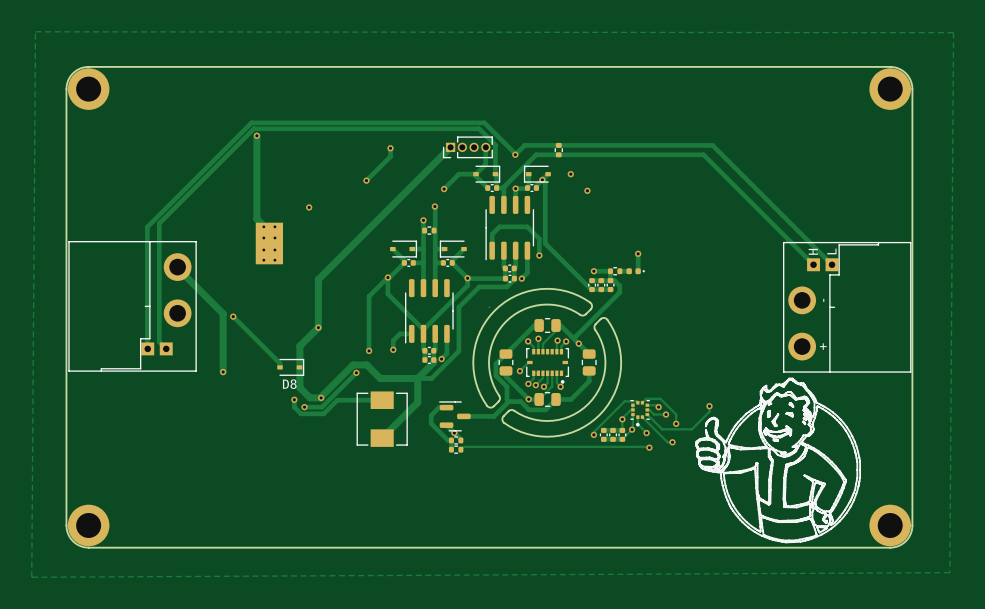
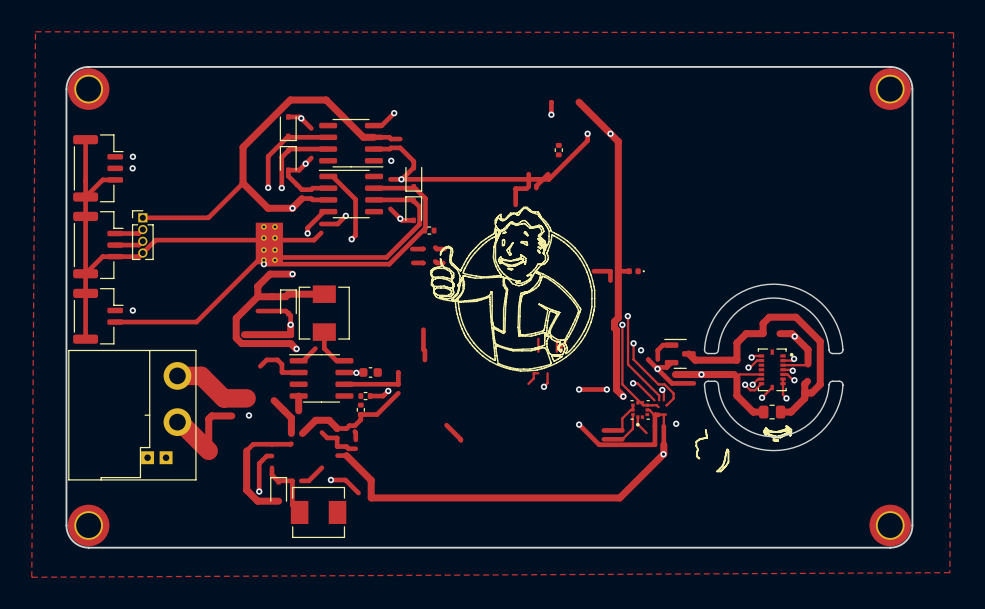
track: none -> (551, 102) (551, 114)
track: none -> (579, 102) (618, 141) (618, 317) (614, 321) (614, 328) (616, 330) (616, 389) (623, 396)
track: none -> (394, 113) (381, 125) (373, 125)
via: none -> (394, 113)
via: none -> (551, 114)
track: none -> (288, 116) (299, 116) (311, 128)
via: none -> (301, 118)
part: none -> (288, 127)
track: none -> (587, 133) (587, 140) (548, 179) (390, 179)
via: none -> (587, 133)
via: none -> (610, 133)
track: (256, 135) (256, 219) (263, 225) -> none
via: (256, 135) -> none
track: none -> (328, 137) (288, 136) (268, 156) (268, 187)
track: none -> (85, 139) (85, 339)
track: none -> (400, 139) (363, 137) (326, 100) (290, 100) (243, 147) (243, 183)
part: none -> (351, 143)
track: (450, 147) (318, 279) (318, 327) (299, 346) (299, 387) (310, 397) (321, 397) (353, 364) (366, 364) (380, 378) (417, 378) -> none
part: (467, 147) -> none
track: (485, 147) (485, 164) (476, 176) -> none
track: (390, 148) (390, 156) (366, 180) -> none
via position: (390, 148) -> (391, 160)
track: none -> (328, 149) (289, 149) (281, 157) (281, 188)
track: none -> (373, 149) (400, 147) (413, 161) (413, 167) (401, 179)
via: (515, 154) -> none
via: none -> (132, 156)
track: none -> (311, 157) (299, 170) (288, 170) (288, 176) (301, 189) (328, 188)
part: none -> (288, 159)
via: none -> (305, 163)
part: none -> (98, 168)
via: none -> (132, 168)
part: (486, 174) -> none
part: (537, 174) -> none
via: (570, 174) -> none
track: none -> (328, 176) (332, 176) (355, 199) (355, 235) (351, 239)
part: none -> (413, 178)
track: none -> (115, 179) (102, 179) (85, 197)
via: none -> (401, 179)
track: (542, 179) (545, 182) (545, 243) (591, 289) (610, 289) -> none
via: (542, 179) -> none
via: (366, 180) -> none
track: none -> (243, 183) (208, 217) (142, 217)
track: none -> (243, 183) (268, 208) (292, 208) (301, 198) (328, 199)
via: none -> (268, 187)
via: none -> (281, 188)
track: none -> (374, 188) (413, 186) (425, 198) (425, 228) (389, 264) (263, 264)
track: (487, 188) (473, 174) (459, 174) (444, 189) -> none
part: (492, 188) -> none
track: (502, 188) (496, 188) (495, 145) (479, 128) (253, 128) (159, 223) (159, 341) (166, 348) -> none
via: (515, 188) -> none
part: (531, 188) -> none
via: (444, 189) -> none
via: (587, 190) -> none
part: none -> (350, 194)
track: none -> (374, 199) (412, 199) (419, 206) (419, 224) (386, 257) (261, 257) (196, 322) (115, 322)
track: (503, 204) (503, 187) (536, 154) (703, 154) (813, 264) -> none
track: (434, 206) (435, 288) -> none
via: (434, 206) -> none
via: (309, 207) -> none
via: none -> (292, 208)
track: none -> (390, 208) (401, 220) (413, 220)
part: none -> (413, 209)
track: none -> (328, 211) (323, 211) (307, 227) (307, 233)
track: none -> (345, 215) (337, 223) (321, 223)
via: none -> (345, 215)
via: none -> (400, 218)
track: (423, 220) (423, 288) -> none
via: (423, 220) -> none
part: (509, 228) -> none
track: none -> (142, 229) (138, 233) (115, 233)
line: none -> (496, 229) (495, 233) (496, 236) (499, 231) (496, 229)
line: none -> (524, 231) (527, 235) (524, 233)
track: none -> (321, 232) (314, 240) (155, 240) (139, 256) (102, 256) (85, 273)
line: none -> (504, 232) (503, 232) (503, 233) (505, 232) (504, 232)
via: none -> (307, 233)
part: none -> (142, 235)
line: none -> (539, 236) (546, 245) (549, 241) (547, 227) (537, 214) (530, 211) (526, 208) (523, 208) (518, 215) (512, 214) (503, 220) (501, 220) (497, 217) (495, 224) (495, 220) (497, 216) (500, 214) (501, 219) (504, 219) (510, 213) (517, 213) (523, 207) (527, 207) (532, 211) (538, 211) (551, 231) (575, 248) (589, 270) (594, 290) (594, 306) (591, 322) (577, 345) (556, 363) (535, 370) (520, 371) (504, 367) (489, 360) (477, 350) (465, 336) (458, 318) (455, 301) (436, 296) (433, 292) (434, 287)
line: none -> (539, 236) (543, 231) (541, 226) (538, 225) (531, 227) (525, 220) (516, 223) (511, 221) (500, 230) (495, 226) (494, 233) (480, 242) (471, 252) (460, 271)
line: none -> (494, 237) (493, 258) (501, 275) (483, 277) (463, 273) (474, 253) (486, 242) (494, 237)
via: none -> (351, 239)
line: none -> (503, 239) (504, 244) (502, 245) (502, 240) (503, 239)
track: none -> (142, 241) (139, 245) (115, 245)
line: none -> (521, 241) (526, 241) (527, 245) (520, 242) (521, 241)
line: none -> (512, 242) (507, 250) (509, 254) (511, 254) (509, 248) (512, 242)
part: none -> (98, 245)
line: none -> (538, 246) (539, 247) (540, 248) (538, 247) (538, 246)
track: (392, 249) (404, 262) (387, 277) -> none
part: (403, 249) -> none
part: (453, 249) -> none
track: (464, 249) (452, 262) (467, 278) (505, 278) (503, 250) -> none
track: (492, 250) (492, 234) (499, 226) (527, 226) (539, 238) (539, 255) -> none
track: (515, 250) (514, 279) (506, 286) (479, 286) (458, 307) (458, 351) (431, 378) (417, 378) -> none
track: (527, 250) (527, 273) (521, 278) -> none
line: none -> (539, 252) (537, 250) (539, 252)
line: none -> (543, 252) (543, 249) (538, 242) (545, 249) (538, 238) (545, 247) (538, 236) (541, 230) (539, 226) (529, 228) (524, 223) (515, 225) (510, 223) (501, 231) (495, 244) (495, 259) (498, 267) (507, 277) (520, 281) (515, 282) (517, 283) (528, 279) (531, 274) (527, 275) (537, 264) (542, 263) (545, 260) (543, 253)
track: (638, 253) (638, 271) -> none
via: (638, 253) -> none
line: none -> (520, 254) (525, 258) (524, 264) (524, 261) (514, 266) (507, 266) (500, 263) (498, 260) (500, 257) (511, 260) (520, 257) (520, 254)
via: (539, 255) -> none
line: none -> (440, 258) (443, 266) (453, 273) (451, 280) (454, 285) (453, 293) (450, 296) (439, 296)
line: none -> (440, 258) (441, 266) (430, 270) (431, 285) (433, 287)
line: none -> (522, 259) (513, 260) (500, 260) (511, 265) (520, 262) (523, 259) (522, 259)
part: (408, 262) -> none
part: (447, 262) -> none
via: none -> (263, 264)
track: (832, 264) (712, 145) (524, 145) (515, 154) (484, 122) (251, 122) (147, 227) (147, 349) -> none
track: (177, 268) (223, 313) (223, 372) -> none
line: none -> (508, 268) (510, 268) (512, 269) (509, 269) (508, 268)
part: (509, 268) -> none
line: none -> (460, 271) (451, 262) (451, 248) (448, 246) (444, 247) (441, 251) (440, 255) (445, 248) (451, 248) (450, 261) (457, 269) (460, 275) (459, 282) (457, 292) (452, 297) (446, 299) (439, 296)
via: (593, 271) -> none
part: (615, 271) -> none
track: none -> (292, 274) (270, 274) (257, 286) (257, 296)
via: none -> (292, 274)
track: (387, 277) (369, 296) (369, 350) -> none
track: (387, 277) (387, 294) (423, 329) (467, 285) (467, 278) -> none
via: (387, 277) -> none
line: none -> (433, 277) (432, 271) (437, 268) (444, 268) (450, 271) (452, 275) (451, 278) (433, 277)
line: none -> (438, 278) (451, 282) (452, 287) (433, 286) (431, 282) (433, 279) (438, 278)
line: none -> (461, 278) (463, 290) (455, 300) (451, 300) (457, 293) (461, 278)
via: (467, 278) -> none
part: (509, 278) -> none
via: (521, 278) -> none
track: (592, 280) (614, 280) (619, 286) (619, 292) (575, 337) (572, 337) -> none
part: (592, 285) -> none
part: (601, 285) -> none
part: (610, 285) -> none
line: none -> (436, 288) (445, 288) (451, 291) (447, 295) (437, 295) (434, 291) (436, 288)
track: none -> (324, 294) (257, 296)
track: none -> (257, 296) (236, 318) (236, 338) (241, 343) (290, 343) (296, 348)
line: none -> (489, 296) (476, 301) (458, 303) (461, 319) (470, 338) (481, 350) (495, 360) (489, 296)
line: none -> (456, 300) (481, 298) (492, 292) (493, 325) (503, 331) (503, 309) (506, 290) (503, 285) (503, 276) (475, 278) (463, 275) (463, 290) (456, 300)
part: none -> (288, 302)
board edge: (590, 302) (566, 291) (541, 289) (516, 295) (494, 310) (480, 331) (473, 356) (475, 382) (487, 406) (493, 406) (499, 399) (490, 374) (489, 357) (493, 340) (506, 321) (525, 308) (541, 304) (559, 305) (583, 315) (591, 308) (590, 302) -> none
part position: (132, 306) -> (132, 415)
part: (847, 307) -> none
via: none -> (132, 310)
track: none -> (257, 311) (285, 311) (290, 315) (290, 334) (244, 334)
part: (429, 311) -> none
line: none -> (550, 311) (556, 314) (546, 336) (547, 320) (550, 311)
line: none -> (559, 312) (539, 304) (547, 310) (544, 330) (520, 334) (522, 295) (537, 286) (542, 276) (559, 287) (577, 308) (576, 316) (564, 340) (557, 339) (550, 333) (559, 312)
part: none -> (324, 313)
part: none -> (98, 316)
track: (233, 316) (280, 363) (280, 367) -> none
via: (233, 316) -> none
track: none -> (627, 316) (628, 364) (659, 395) (659, 400)
via: none -> (627, 316)
board edge: (600, 319) (594, 327) (604, 350) (604, 373) (598, 390) (588, 403) (574, 414) (552, 420) (535, 419) (510, 410) (503, 416) (503, 422) (527, 434) (553, 436) (578, 429) (599, 415) (607, 405) (616, 387) (621, 362) (618, 343) (614, 331) (606, 319) (600, 319) -> none
via: none -> (290, 324)
track: none -> (622, 324) (622, 384) (643, 405) (647, 405)
via: none -> (622, 324)
track: (539, 325) (534, 325) (495, 364) (495, 375) (507, 386) (507, 399) (508, 401) -> none
part: (547, 325) -> none
via: (318, 327) -> none
line: none -> (493, 328) (503, 333) (504, 332) (507, 289) (504, 283) (504, 277) (518, 285) (530, 280) (534, 272) (540, 274) (538, 281) (530, 289) (520, 294) (518, 335)
line: none -> (493, 328) (495, 343) (502, 346) (513, 349) (532, 348) (544, 344) (545, 332) (531, 336) (518, 335)
track: none -> (324, 332) (324, 348) (336, 360) (344, 360)
track: (411, 333) (399, 333) (393, 340) (393, 349) -> none
track: (435, 333) (433, 362) (417, 378) -> none
track: (446, 333) (446, 353) (441, 359) -> none
track: none -> (779, 333) (791, 333) (808, 349) (806, 365) (783, 365)
line: none -> (549, 336) (552, 339) (560, 342) (557, 348) (560, 351) (561, 349) (558, 349) (558, 347) (563, 344) (564, 348) (562, 354) (549, 353) (546, 340) (549, 336)
via: none -> (794, 336)
via: (538, 338) -> none
via: (557, 340) -> none
track: (528, 341) (533, 346) (533, 351) -> none
via: (528, 341) -> none
via: (566, 341) -> none
line: none -> (564, 342) (567, 349) (565, 353) (574, 345) (584, 330) (591, 306) (591, 290) (587, 272) (578, 256) (567, 244) (551, 235) (547, 253) (547, 259) (536, 271) (562, 287) (580, 309) (574, 325) (564, 342)
via: (578, 343) -> none
track: none -> (633, 343) (633, 359) (658, 384) (664, 384) (673, 393) (673, 398) (666, 405)
via: none -> (633, 343)
line: none -> (496, 345) (513, 350) (531, 350) (544, 347) (551, 363) (529, 369) (517, 369) (502, 365) (498, 363) (496, 345)
track: none -> (671, 345) (662, 345) (657, 350) (657, 359)
via: none -> (296, 348)
track: none -> (315, 348) (303, 360) (298, 360)
via: (393, 349) -> none
board edge: none -> (704, 349) (710, 324) (726, 303) (748, 289) (773, 284) (799, 289) (821, 303) (836, 324) (842, 349) (840, 353) (829, 352) (823, 328) (813, 315) (805, 307) (790, 300) (773, 298) (757, 300) (742, 307) (733, 315) (724, 328) (717, 352) (707, 353) (704, 349)
via: (369, 350) -> none
part: (429, 350) -> none
via: none -> (641, 350)
track: (542, 351) (542, 343) (556, 330) (556, 325) (560, 325) (589, 354) -> none
part: none -> (679, 353)
track: none -> (688, 353) (695, 360) (736, 360) (736, 342) (746, 333) (763, 333) (763, 323) (769, 317) (796, 317) (820, 341) (820, 384) (811, 393) (804, 393)
track: none -> (761, 355) (751, 357)
line: none -> (561, 356) (554, 361) (551, 355) (561, 356)
via: none -> (751, 357)
track: none -> (794, 358) (783, 360)
via: none -> (794, 358)
via: (441, 359) -> none
track: none -> (648, 359) (671, 383) (693, 383)
part: (429, 360) -> none
track: none -> (761, 360) (757, 360) (748, 367)
part: (505, 362) -> none
track: (529, 362) (519, 371) -> none
part: (589, 362) -> none
track: none -> (671, 362) (666, 367) (656, 367)
part rotation: 0° (547, 365) -> 90° counterclockwise (775, 369)
part position: (547, 365) -> (775, 369)
track: none -> (260, 366) (266, 359) (277, 359) (281, 364) (282, 372) (298, 372)
D8: (290, 367) -> none
via: none -> (748, 367)
via: none -> (657, 368)
track: none -> (783, 369) (792, 370)
track: (505, 370) (505, 376) (528, 399) (539, 399) (552, 386) (552, 373) -> none
track: (589, 370) (589, 381) (571, 399) (556, 399) (545, 409) (529, 409) (520, 401) (508, 401) -> none
via: none -> (792, 370)
via: (519, 371) -> none
via: (223, 372) -> none
track: (356, 372) (322, 407) (304, 407) -> none
part: none -> (370, 372)
track: none -> (398, 372) (398, 384) (344, 384)
track: (542, 373) (542, 378) (535, 385) -> none
track: (556, 373) (556, 383) (560, 386) -> none
track: none -> (675, 374) (734, 374) (736, 377)
via: none -> (701, 374)
track: none -> (761, 374) (739, 374) (736, 377)
track: none -> (783, 374) (787, 374) (794, 380)
track: none -> (177, 375) (201, 375) (223, 398) (246, 398)
track: none -> (736, 377) (736, 395) (753, 412) (763, 412)
part: none -> (321, 378)
track: (417, 378) (417, 402) (382, 438) -> none
track: none -> (761, 379) (758, 379) (752, 384)
track: none -> (783, 379) (783, 394) (786, 398)
via: none -> (794, 380)
board edge: none -> (708, 381) (717, 382) (724, 406) (737, 423) (757, 434) (773, 436) (790, 434) (805, 426) (817, 415) (823, 406) (829, 382) (840, 381) (842, 385) (836, 410) (821, 431) (799, 445) (773, 450) (754, 447) (742, 442) (721, 426) (713, 416) (706, 398) (704, 384) (708, 381)
track: none -> (807, 381) (804, 384) (804, 398) (791, 412) (780, 412)
via: (528, 383) -> none
track: none -> (633, 383) (637, 383) (654, 400)
via: none -> (633, 383)
track: none -> (761, 383) (754, 390) (750, 390) (745, 384)
via: none -> (745, 384)
via: none -> (752, 384)
via: (535, 385) -> none
via position: (560, 386) -> (579, 389)
track: none -> (772, 387) (762, 397)
track: none -> (579, 389) (606, 389)
via: none -> (606, 389)
track: none -> (662, 389) (663, 400)
via: none -> (662, 389)
track: none -> (388, 390) (383, 396) (370, 396)
via: none -> (388, 390)
track: none -> (398, 393) (377, 414) (360, 414) (360, 419) (354, 425) (349, 425) (346, 428) (337, 428)
line: (775, 394) (781, 396) (790, 394) (795, 399) (804, 398) (806, 404) (803, 407) (811, 418) (803, 410) (810, 420) (803, 414) (809, 420) (810, 431) (807, 434) (803, 435) (792, 446) (797, 446) (794, 450) (786, 454) (781, 453) (785, 452) (776, 450) (769, 445) (760, 431) (762, 411) (766, 402) (775, 394) -> none
track: none -> (298, 396) (298, 410)
part: none -> (365, 396)
via: none -> (623, 396)
via: (321, 397) -> none
via: none -> (762, 397)
via: none -> (786, 398)
track: (294, 399) (294, 407) (301, 413) (323, 413) (337, 400) (382, 400) -> none
via: (294, 399) -> none
via: (528, 399) -> none
part: (547, 399) -> none
track: none -> (274, 400) (291, 417) (291, 433)
line: (761, 400) (764, 402) (762, 407) (761, 404) (761, 400) -> none
track: (508, 401) (494, 416) (463, 416) -> none
track: (637, 402) (624, 401) (593, 432) (593, 434) -> none
track: (642, 402) (646, 398) (660, 398) (676, 414) (676, 423) -> none
line: (770, 403) (769, 403) (768, 404) (771, 403) (770, 403) -> none
line: (790, 403) (793, 406) (789, 404) -> none
track: (709, 406) (709, 411) (691, 429) (662, 429) (647, 414) -> none
via: (709, 406) -> none
via: (304, 407) -> none
track: (446, 407) (439, 407) (431, 415) (431, 423) (448, 440) (451, 440) (451, 449) -> none
via: (658, 407) -> none
line: (759, 408) (740, 424) (728, 444) (749, 448) (766, 446) (758, 429) (761, 409) (759, 408) -> none
part: none -> (360, 409)
line: (769, 410) (769, 415) (767, 416) (767, 411) (769, 410) -> none
part: none -> (772, 412)
line: (786, 412) (786, 413) (792, 416) (792, 413) (786, 412) -> none
track: none -> (658, 414) (654, 415) (654, 444) (599, 444) (579, 424)
track: none -> (663, 414) (663, 453) (619, 497) (371, 497) (371, 480) (346, 455) (337, 455)
via: (666, 414) -> none
line: (778, 414) (775, 420) (776, 425) (774, 426) (772, 421) (778, 414) -> none
track: none -> (231, 415) (211, 415) (208, 418) (208, 450) (179, 422) (177, 422)
via: none -> (248, 415)
part: (454, 416) -> none
track: (642, 417) (667, 442) (672, 442) -> none
line: (803, 418) (805, 419) (806, 420) (804, 418) (803, 418) -> none
part: (382, 419) -> none
via: (622, 419) -> none
line: (805, 424) (803, 421) (805, 424) -> none
track: none -> (337, 428) (329, 420) (315, 420) (302, 433)
via: (632, 429) -> none
line: (705, 430) (708, 438) (719, 444) (716, 451) (719, 456) (719, 464) (716, 467) (705, 468) (711, 470) (718, 469) (723, 464) (723, 456) -> none
track: none -> (354, 431) (355, 439)
track: none -> (321, 432) (327, 437) (337, 437) (337, 446) (355, 448)
via: (454, 432) -> none
via: (646, 433) -> none
via position: (593, 434) -> (579, 424)
part: (603, 434) -> none
part: (613, 434) -> none
part: (622, 434) -> none
part: (456, 440) -> none
via: (672, 442) -> none
line: (725, 442) (736, 423) (746, 413) (759, 404) (761, 397) (765, 401) (776, 393) (782, 395) (787, 391) (790, 391) (796, 398) (805, 396) (809, 402) (805, 407) (812, 417) (814, 413) (812, 398) (803, 385) (796, 383) (791, 379) (789, 379) (783, 386) (778, 385) (769, 391) (766, 391) (763, 388) (760, 395) (760, 391) (763, 388) (766, 385) (766, 390) (770, 390) (776, 384) (782, 384) (789, 378) (792, 378) (798, 383) (803, 383) (816, 402) (840, 419) (854, 441) (860, 461) (860, 477) (853, 500) (839, 521) (821, 534) (800, 541) (786, 542) (772, 539) (755, 532) (740, 519) (727, 500) (720, 472) (701, 468) (698, 464) (699, 458) -> none
line: (725, 442) (717, 433) (717, 419) (713, 417) (709, 419) (706, 422) (705, 426) (710, 419) (716, 420) (715, 433) (725, 447) (723, 456) -> none
track: none -> (291, 443) (253, 444) (246, 450) (246, 490) (257, 501) (278, 501)
track: (649, 447) (463, 446) (460, 449) -> none
via: (649, 447) -> none
line: (728, 447) (729, 461) (722, 471) (746, 469) (757, 463) (758, 497) (768, 502) (769, 480) (771, 461) (768, 456) (768, 448) (740, 449) (728, 447) -> none
line: (698, 448) (697, 443) (702, 439) (710, 439) (715, 442) (717, 447) (716, 449) (698, 448) -> none
part: (456, 449) -> none
line: (703, 449) (698, 450) (697, 453) (699, 457) (717, 459) (716, 453) (703, 449) -> none
via: none -> (663, 454)
track: none -> (271, 456) (266, 456) (259, 463) (259, 491)
line: (702, 459) (710, 459) (717, 462) (712, 466) (703, 466) (699, 462) (702, 459) -> none
track: none -> (271, 467) (271, 475) (278, 481)
track: none -> (321, 467) (308, 480) (301, 480)
line: (755, 468) (756, 488) (760, 531) (746, 522) (736, 510) (726, 490) (723, 474) (741, 472) (755, 468) -> none
track: none -> (279, 480) (292, 480) (292, 505) (299, 512)
track: none -> (330, 480) (345, 480) (358, 493)
via: none -> (330, 480)
line: (816, 482) (822, 485) (811, 507) (813, 492) (816, 482) -> none
line: (824, 483) (804, 475) (813, 481) (809, 501) (785, 505) (787, 467) (803, 457) (807, 447) (824, 458) (843, 480) (842, 487) (829, 511) (823, 511) (815, 504) (825, 483) -> none
part: none -> (278, 490)
via: none -> (259, 491)
line: (759, 499) (768, 504) (770, 503) (772, 460) (769, 454) (770, 448) (784, 457) (796, 451) (800, 443) (805, 446) (803, 453) (796, 461) (786, 465) (784, 507) -> none
line: (759, 499) (760, 514) (767, 517) (779, 520) (797, 520) (810, 516) (810, 503) (796, 507) (784, 507) -> none
line: (815, 507) (812, 512) (814, 524) (827, 526) (830, 520) (828, 515) (824, 518) (824, 520) (827, 520) (826, 522) (823, 520) (825, 513) (817, 510) (815, 507) -> none
part: none -> (318, 512)
line: (829, 513) (832, 521) (831, 524) (839, 517) (849, 502) (857, 478) (857, 461) (852, 443) (843, 427) (832, 416) (817, 406) (812, 424) (813, 431) (801, 442) (827, 458) (846, 480) (840, 497) (829, 513) -> none
line: (761, 516) (763, 534) (768, 536) (782, 540) (795, 540) (816, 534) (809, 518) (796, 522) (778, 522) (761, 516) -> none
line: (817, 527) (819, 532) (827, 528) (824, 527) (817, 527) -> none

